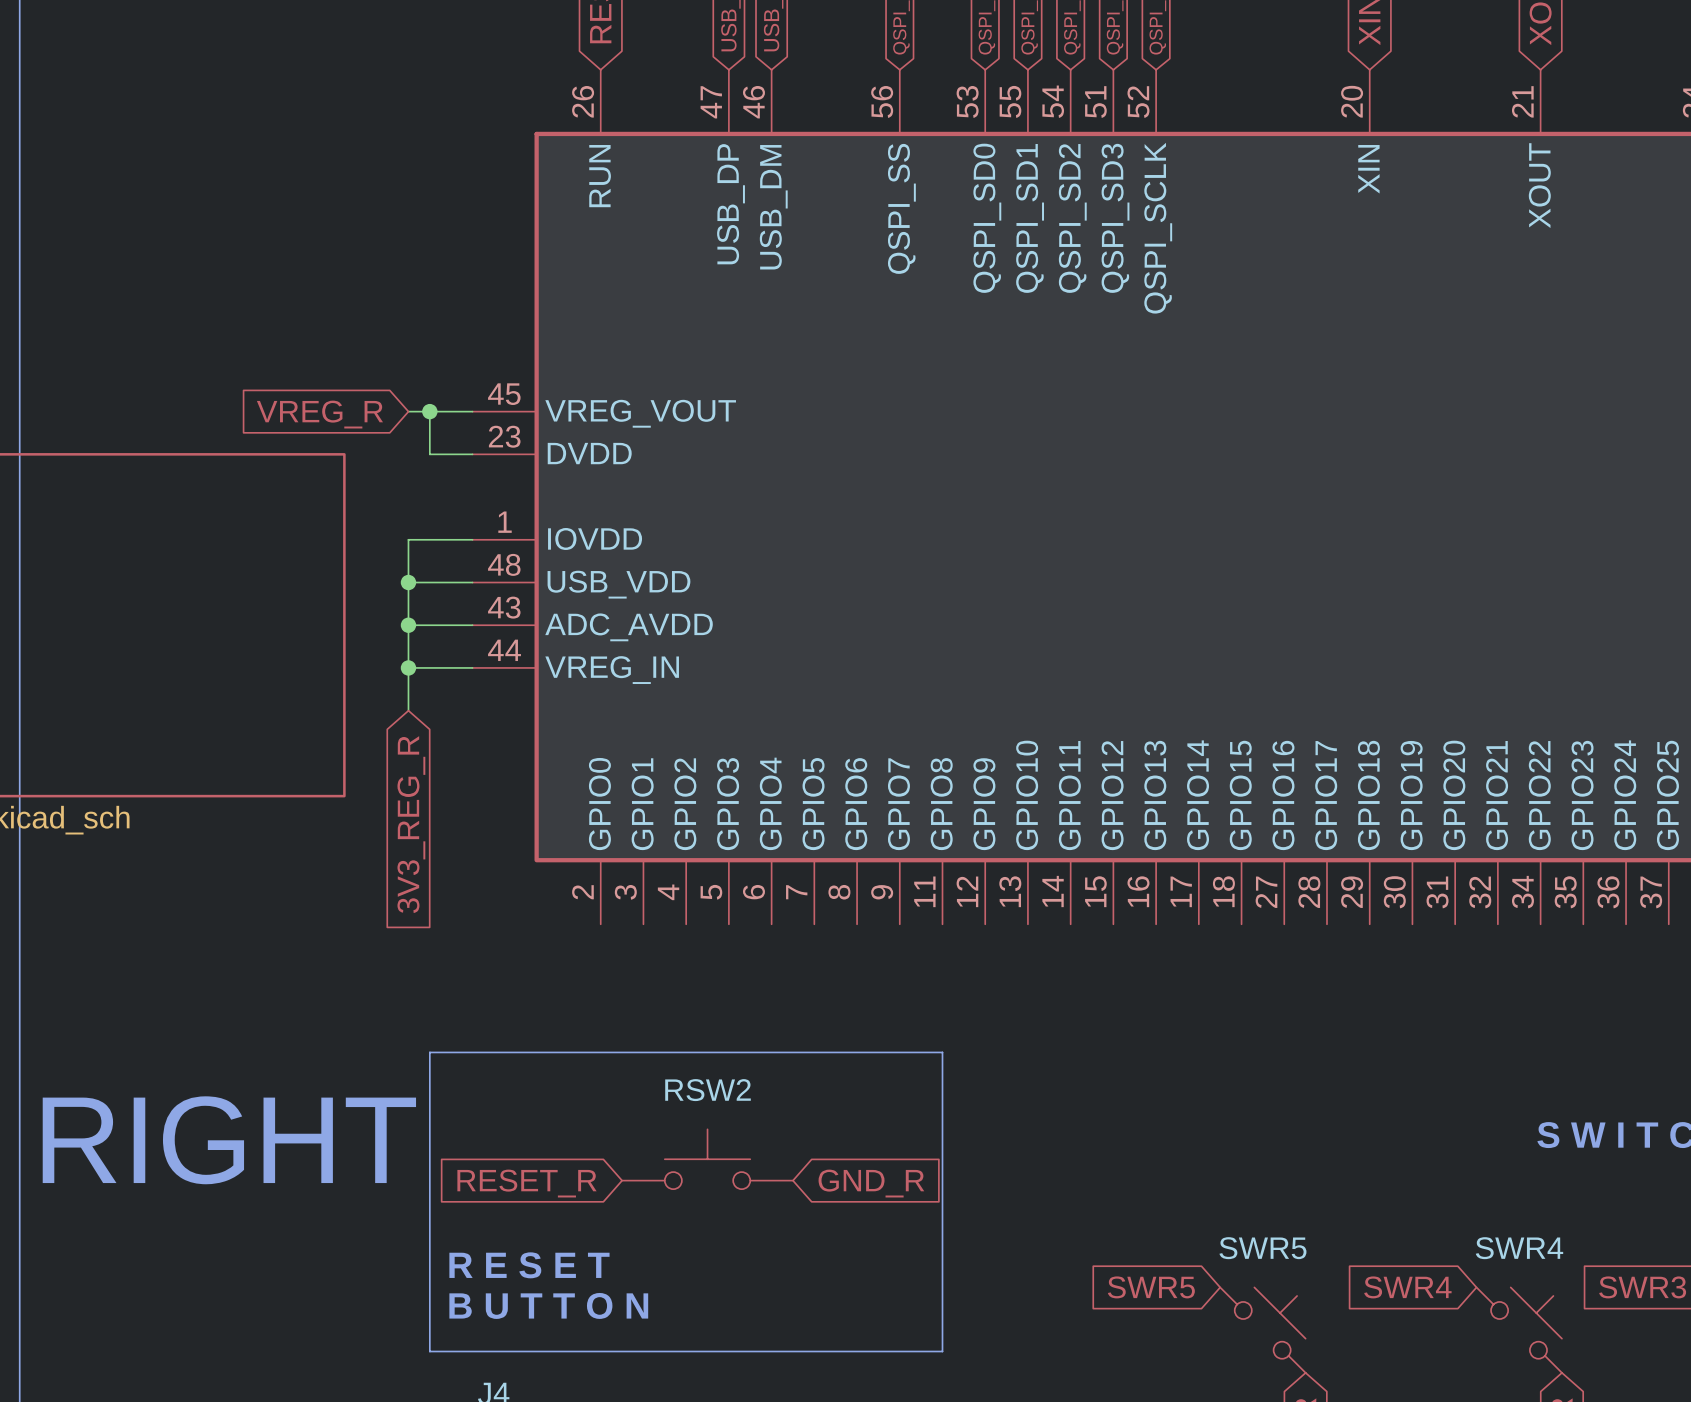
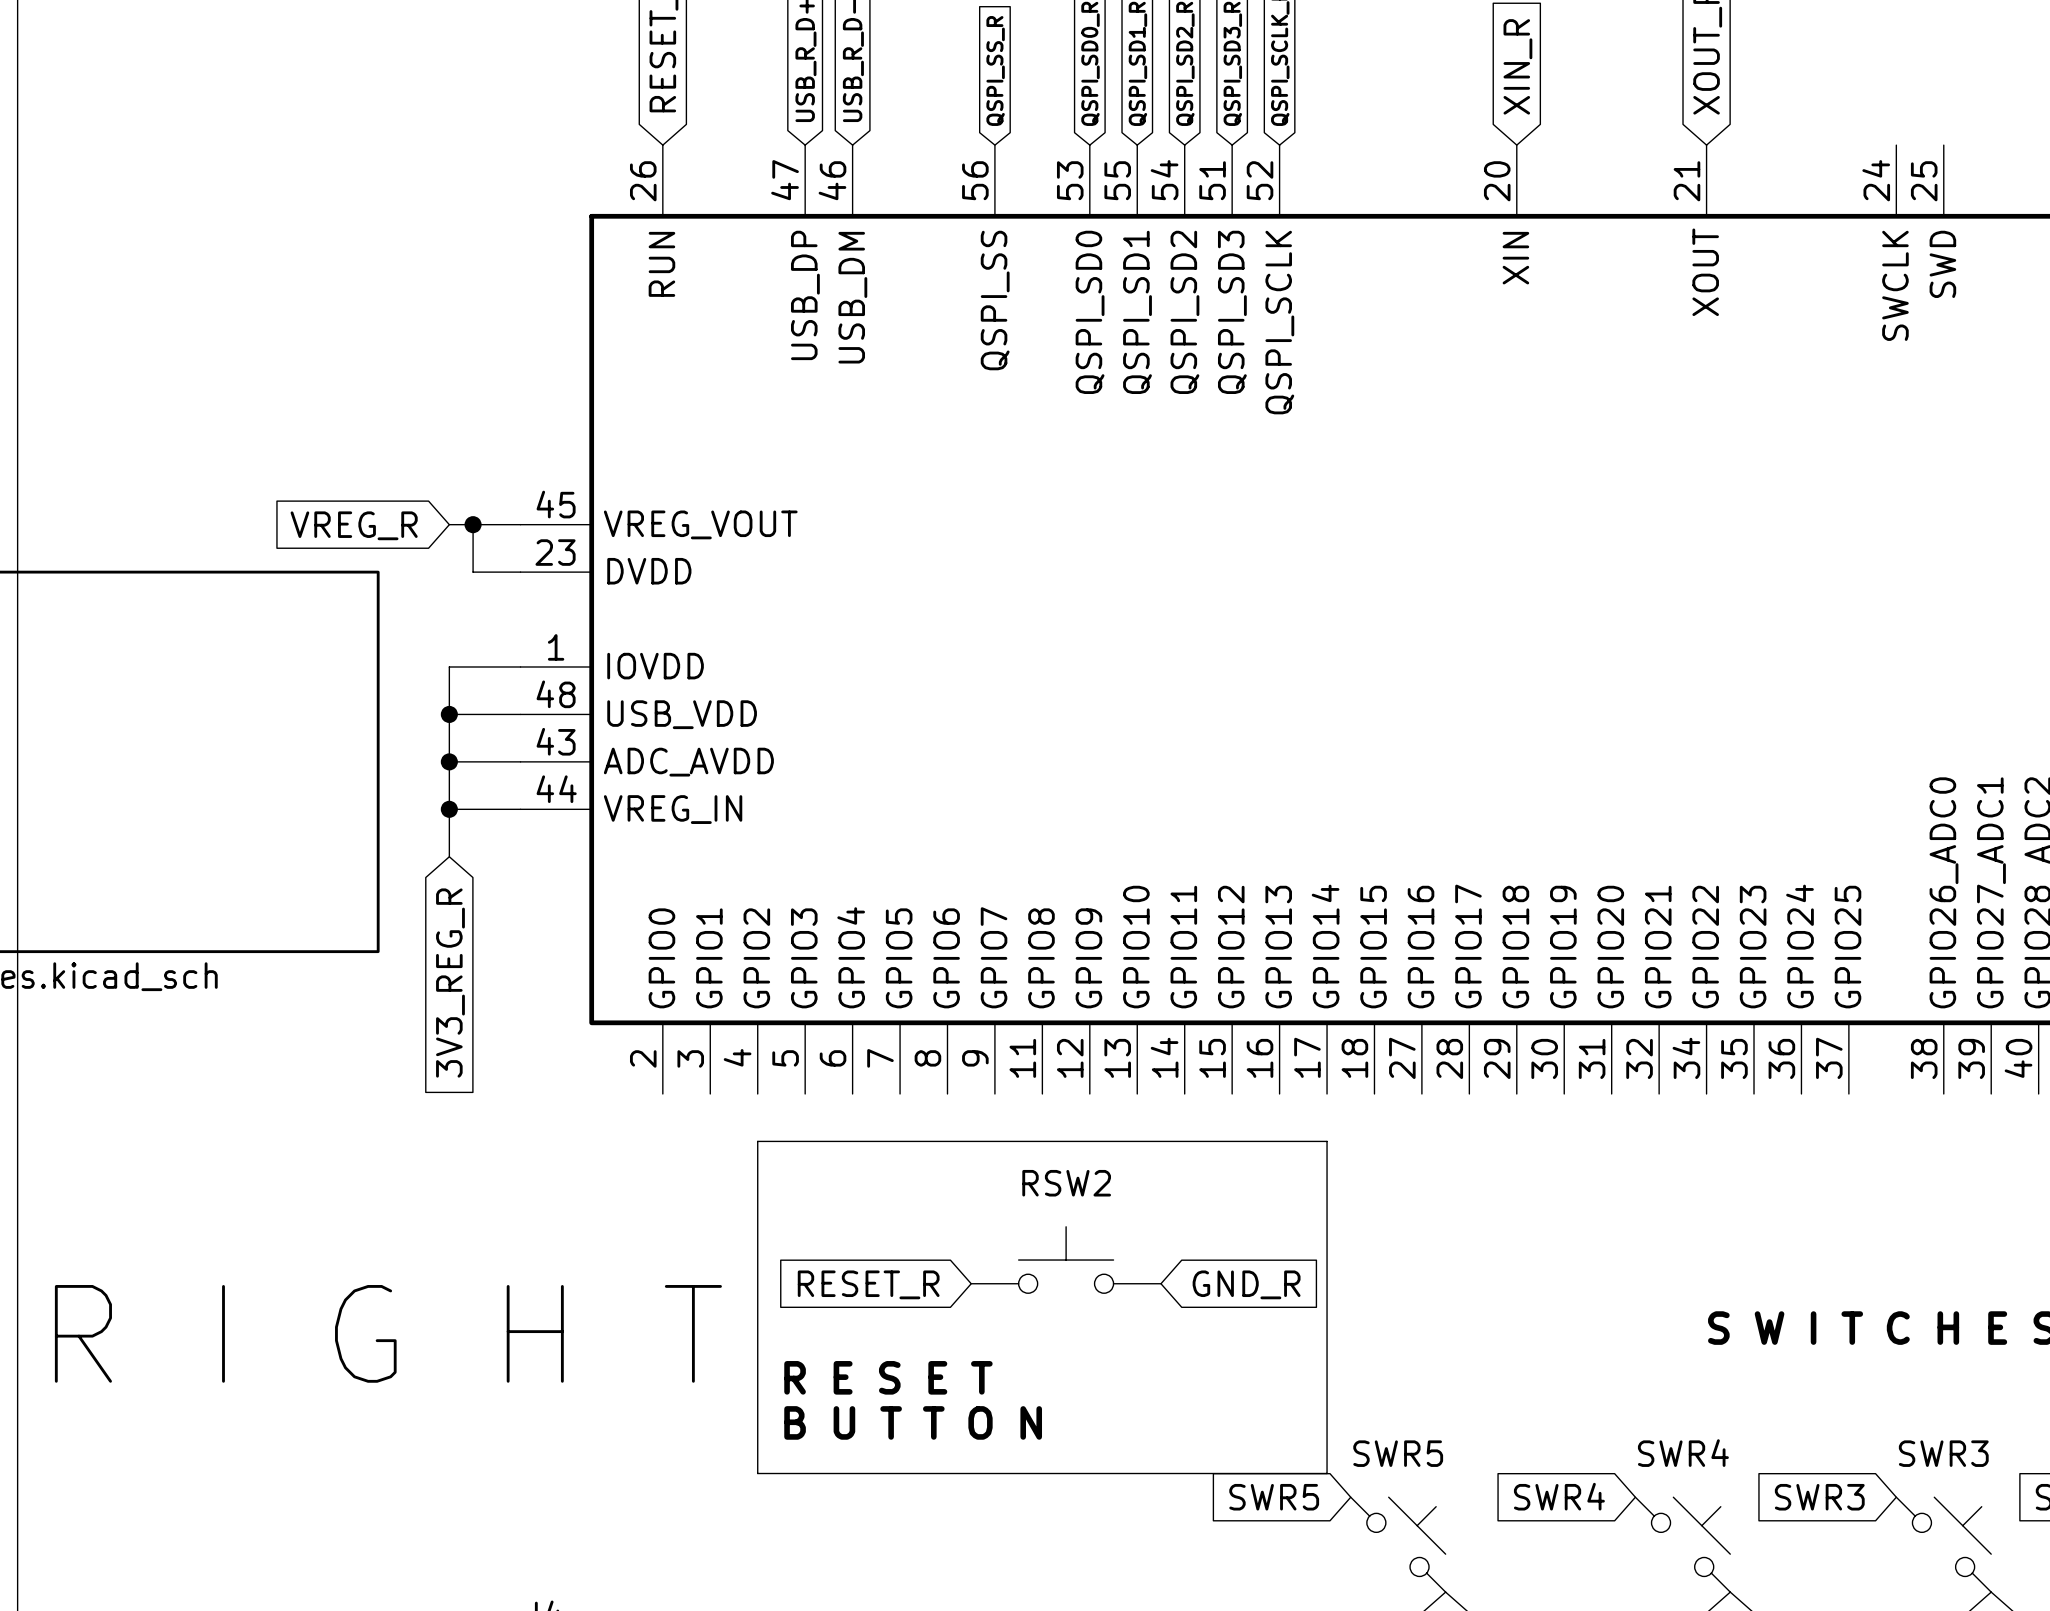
line: (429, 1052) (942, 1052) (942, 1351) (429, 1351) (429, 1052) -> (757, 1141) (1327, 1141) (1327, 1473) (757, 1473) (757, 1141)
text: RIGHT (229, 1140) -> R I G H T (388, 1333)
RSW2 position: (707, 1159) -> (1066, 1260)
global label position: RESET_R (527, 1183) -> RESET_R (868, 1284)
global label position: GND_R (871, 1183) -> GND_R (1246, 1284)
text position: R E S E T (529, 1265) -> R E S E T (888, 1377)
text position: B U T T O N (548, 1305) -> B U T T O N (913, 1422)

